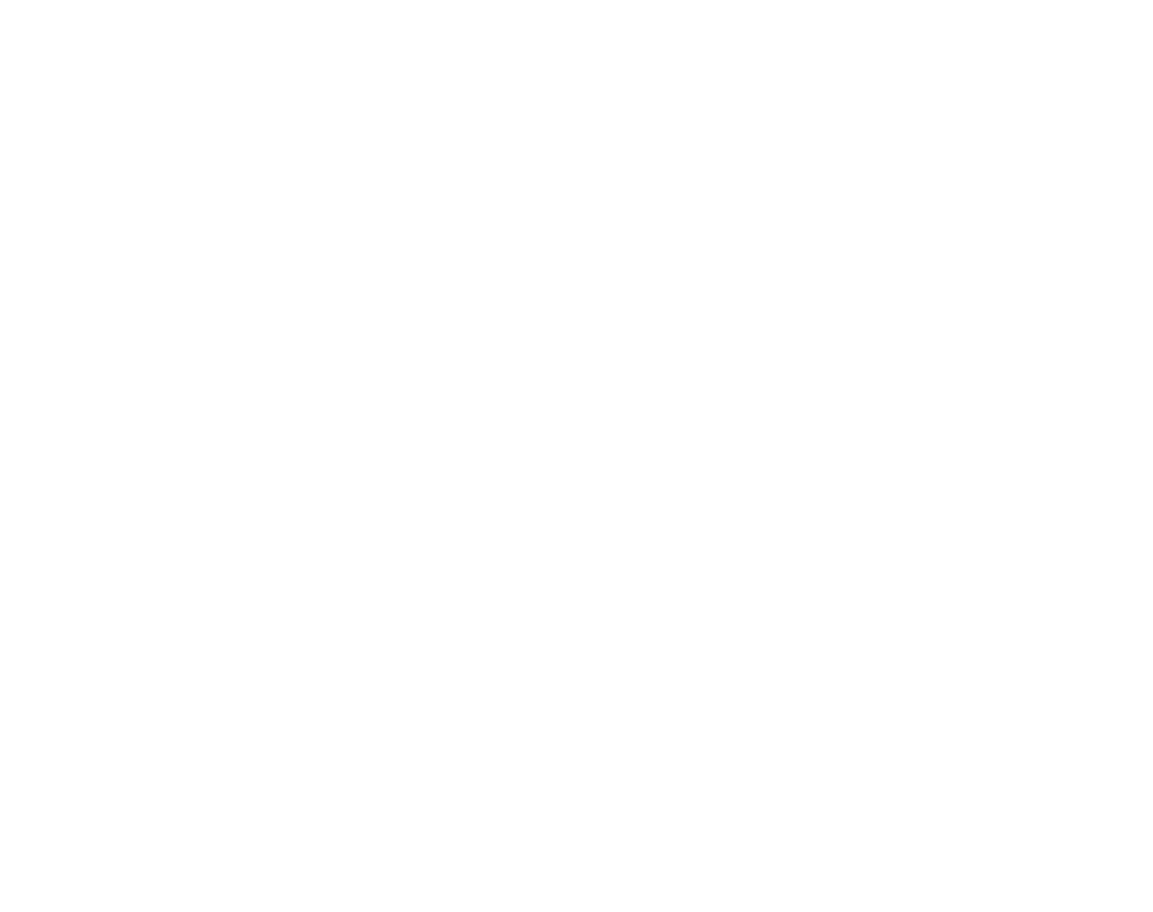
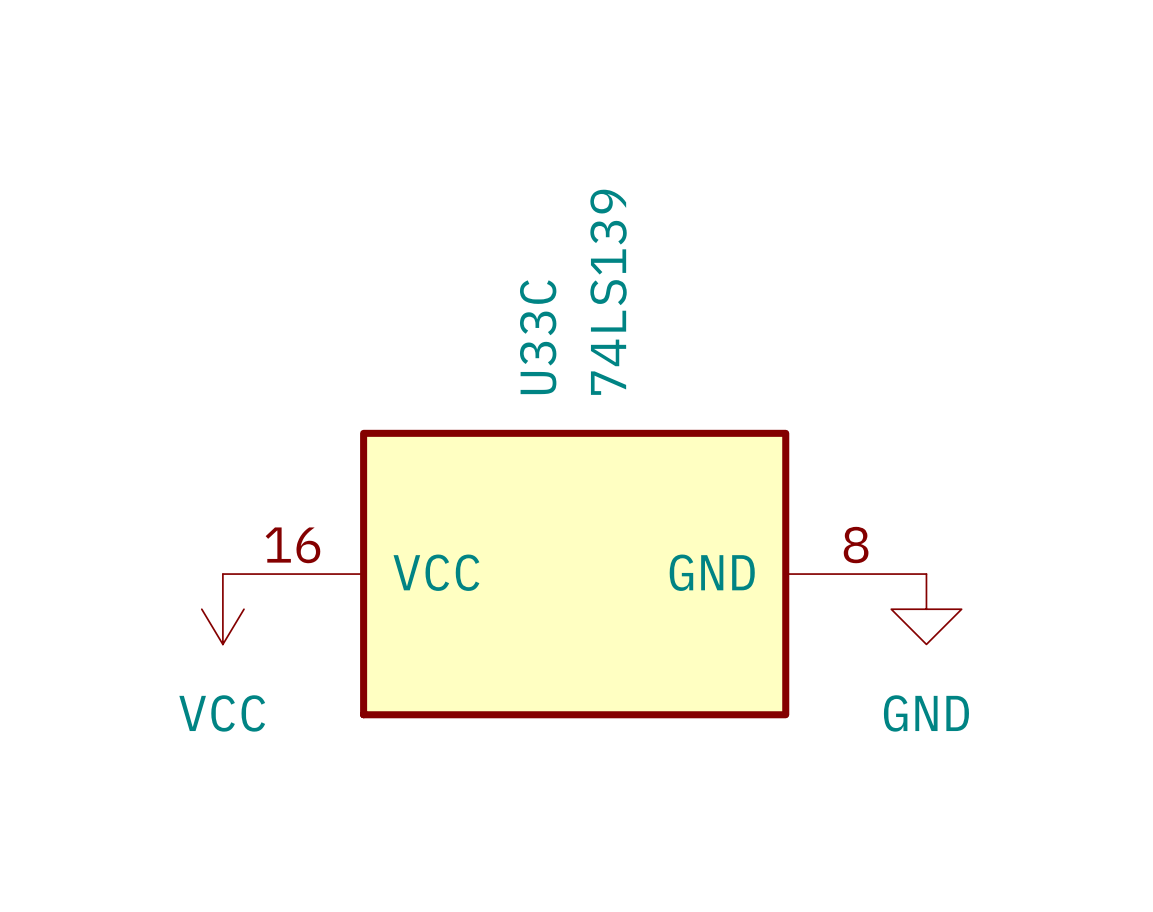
U33C: none -> 74LS139 (574, 574)
power symbol: none -> VCC (222, 609)
power symbol: none -> GND (926, 609)

